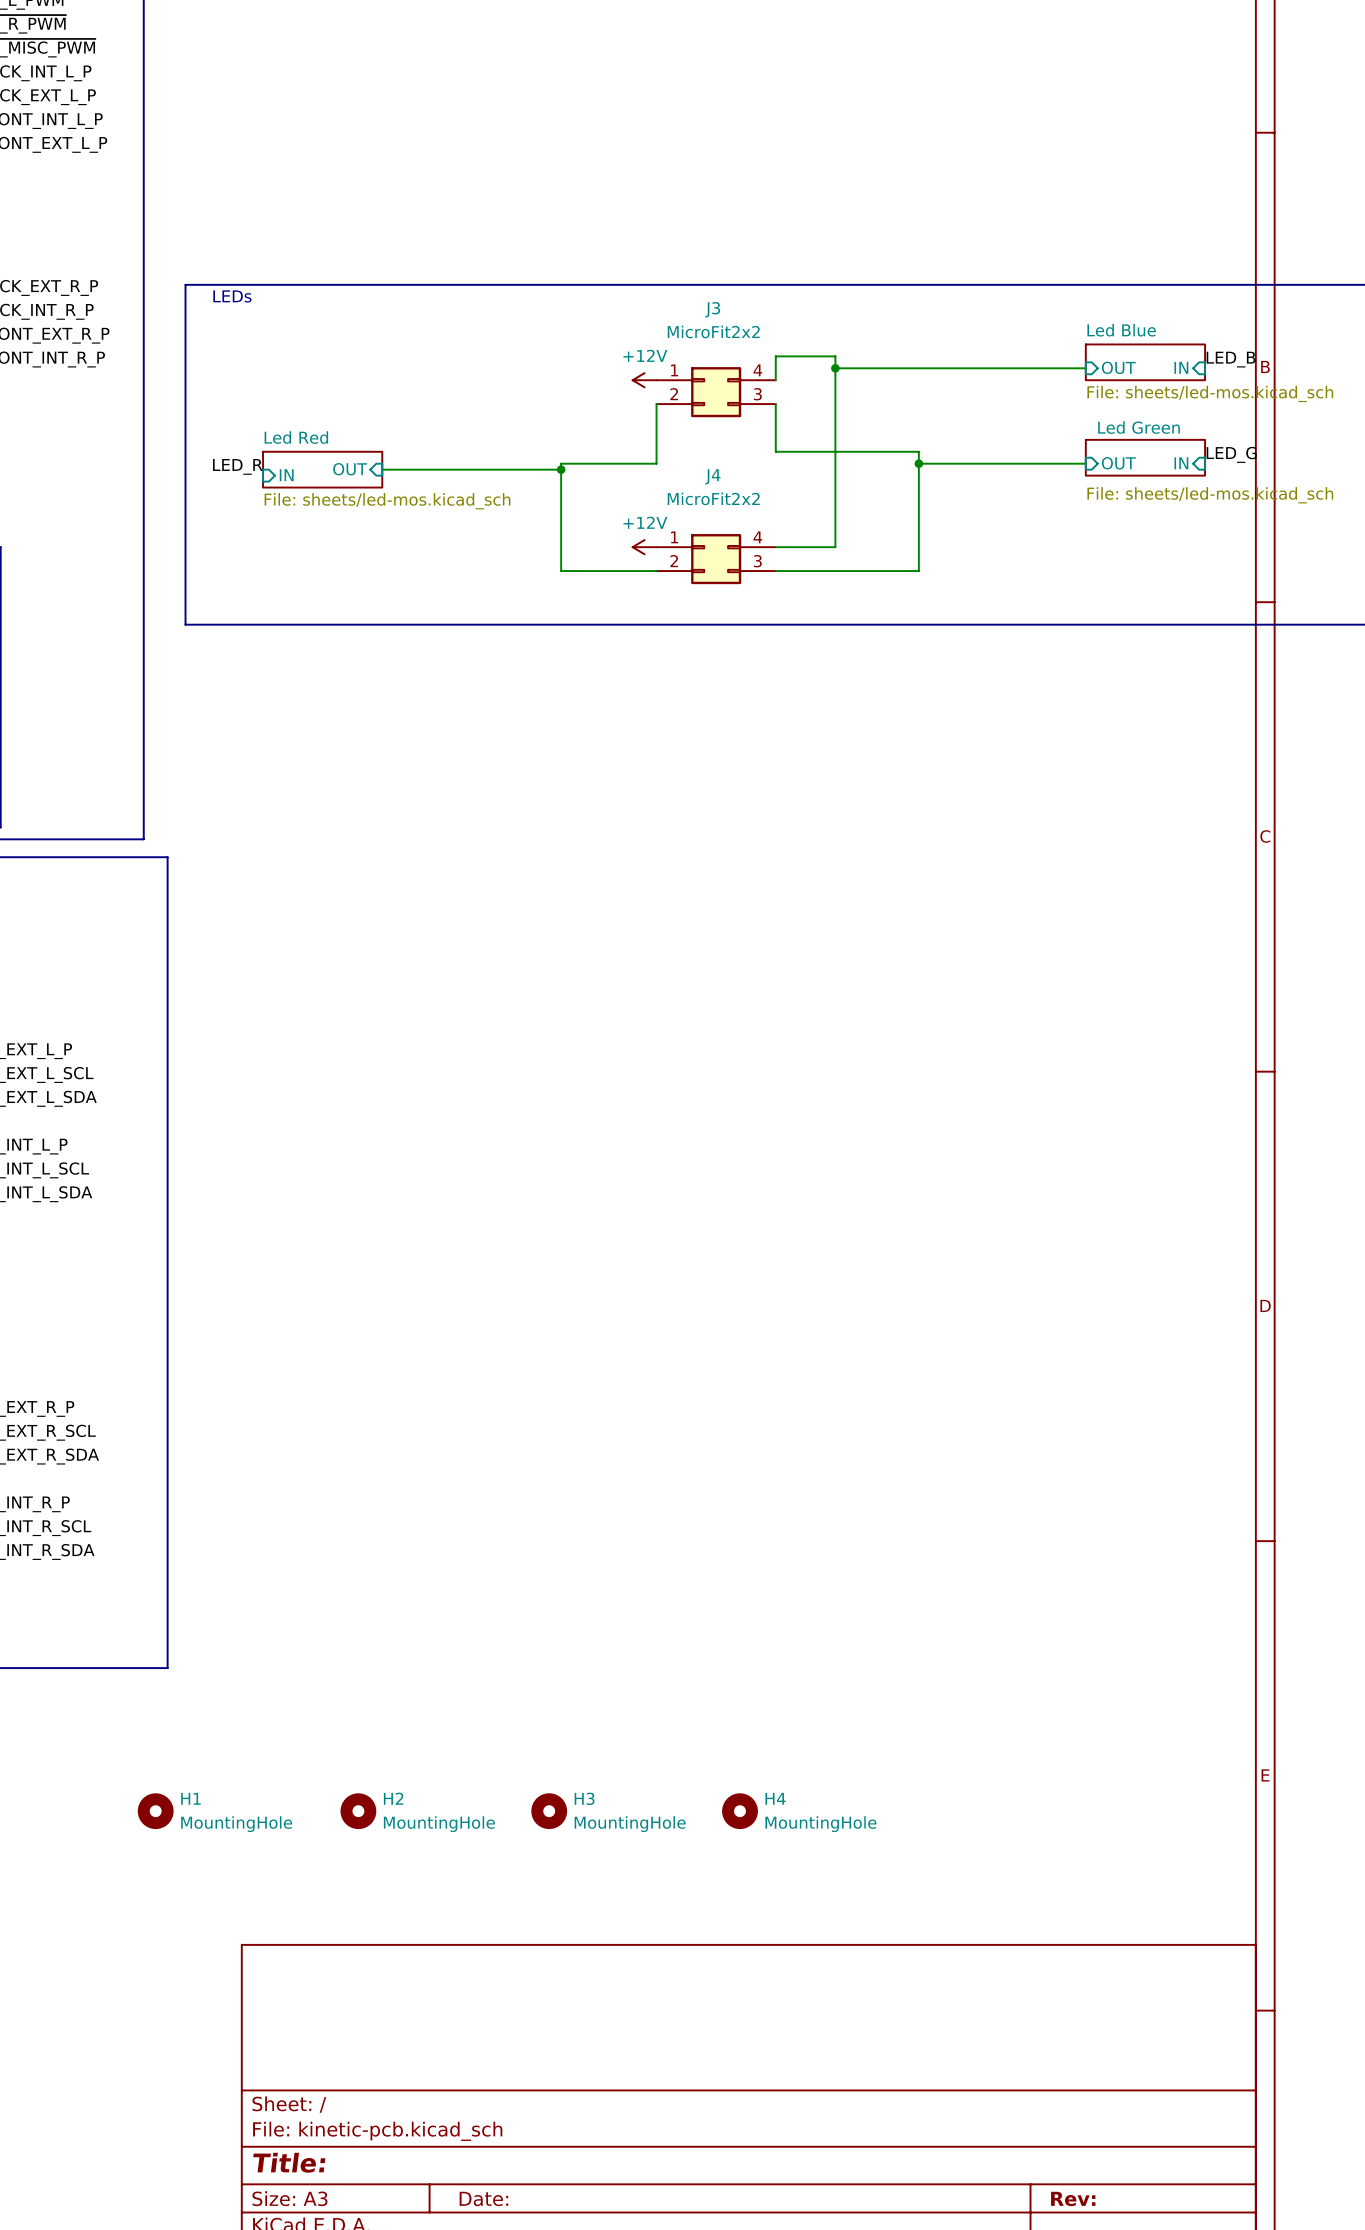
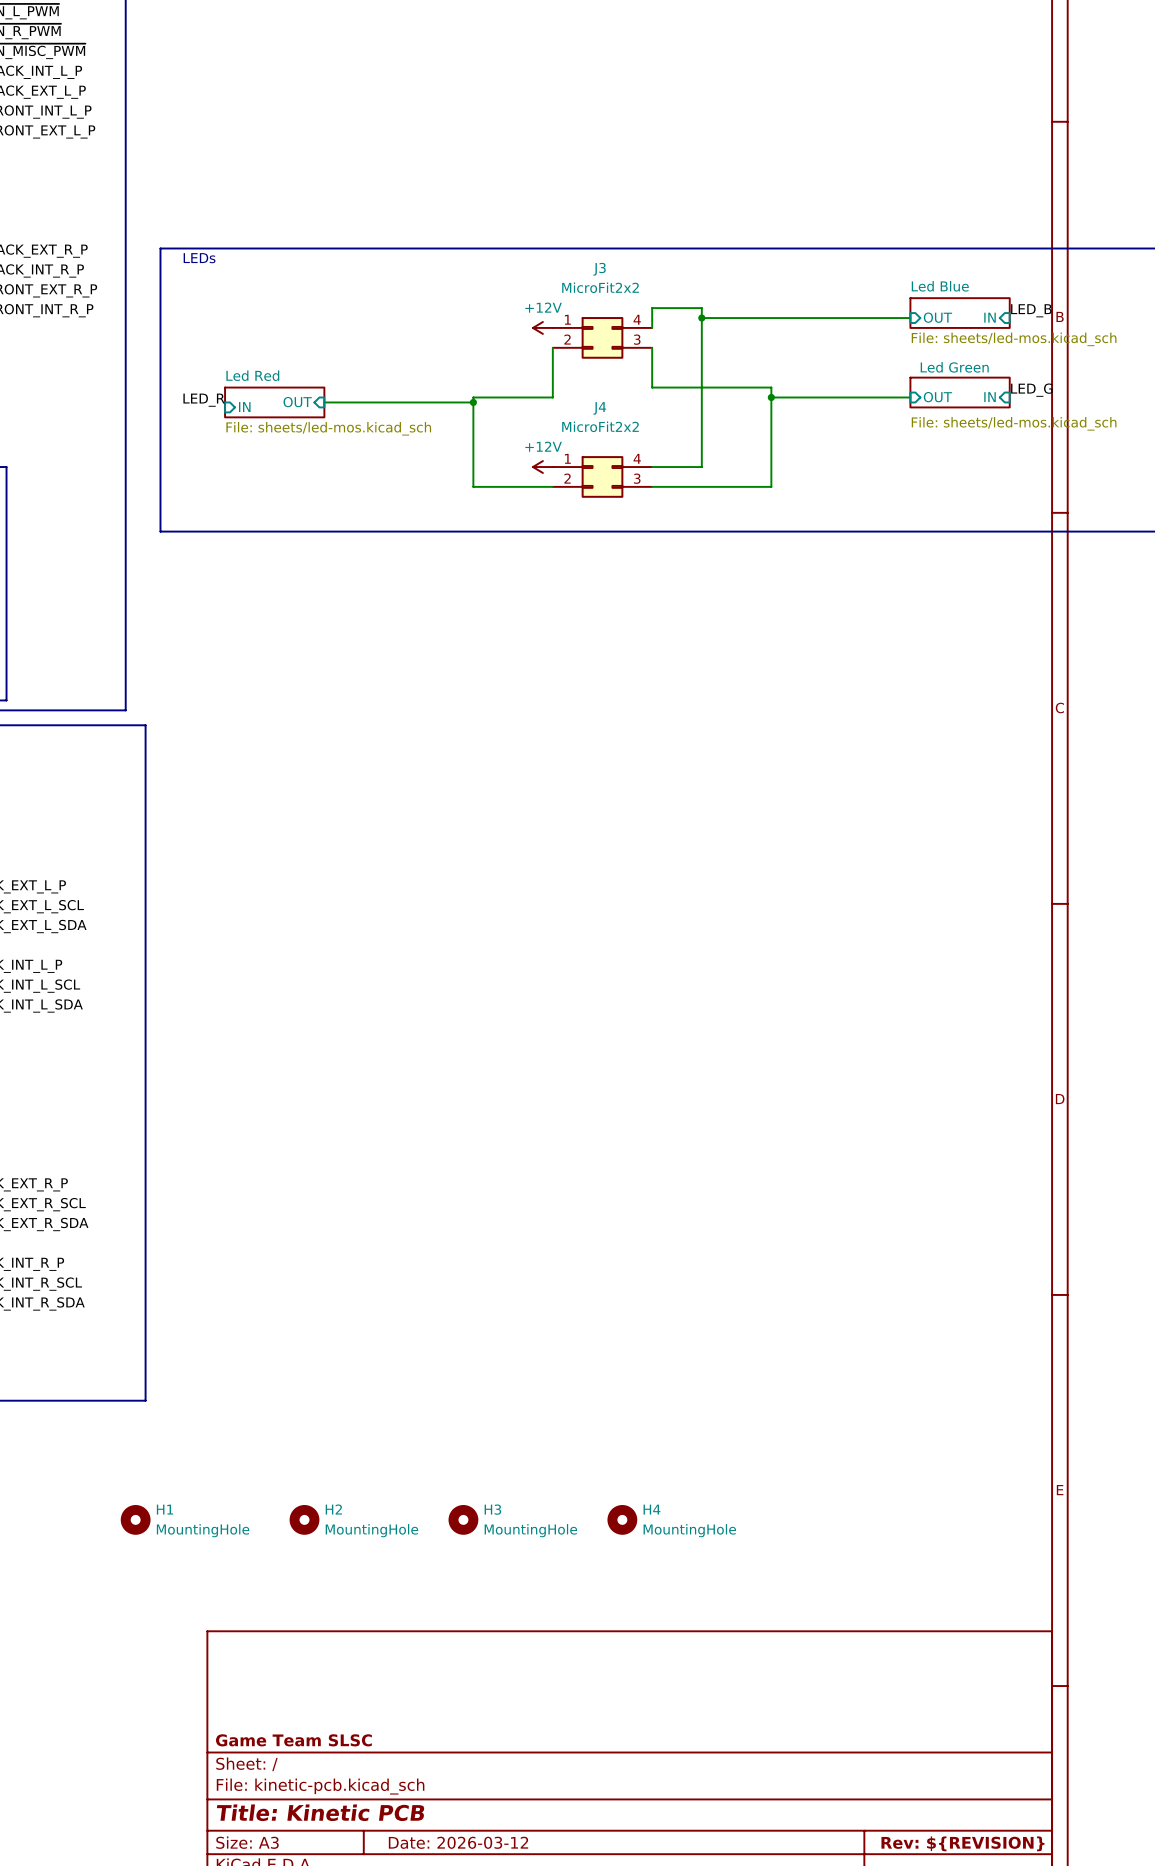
title block: none -> Game Team SLSC (293, 1740)
title block: Title: (289, 2162) -> Title: Kinetic PCB (320, 1812)
title block: Date: (483, 2198) -> Date: 2026-03-12 (458, 1842)
title block: Rev: (1073, 2198) -> Rev: ${REVISION} (962, 1843)

